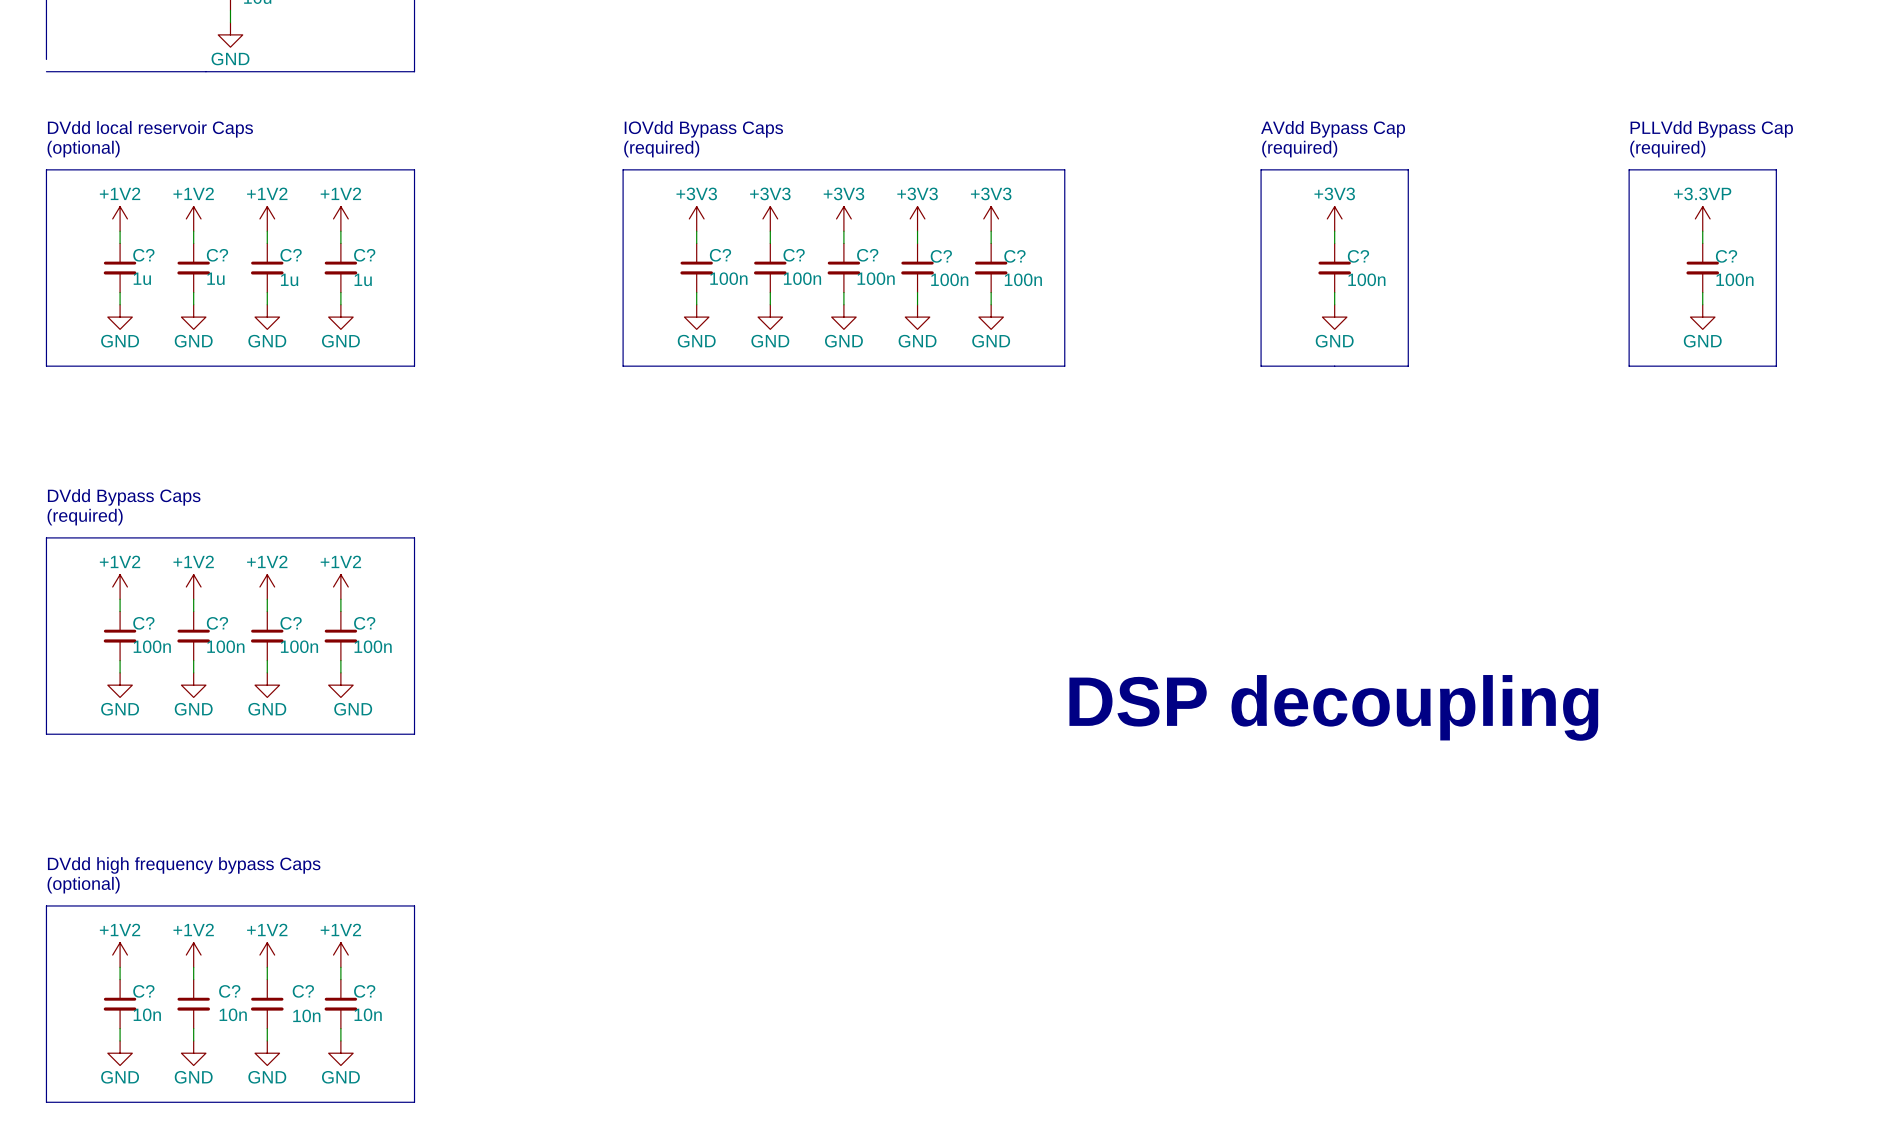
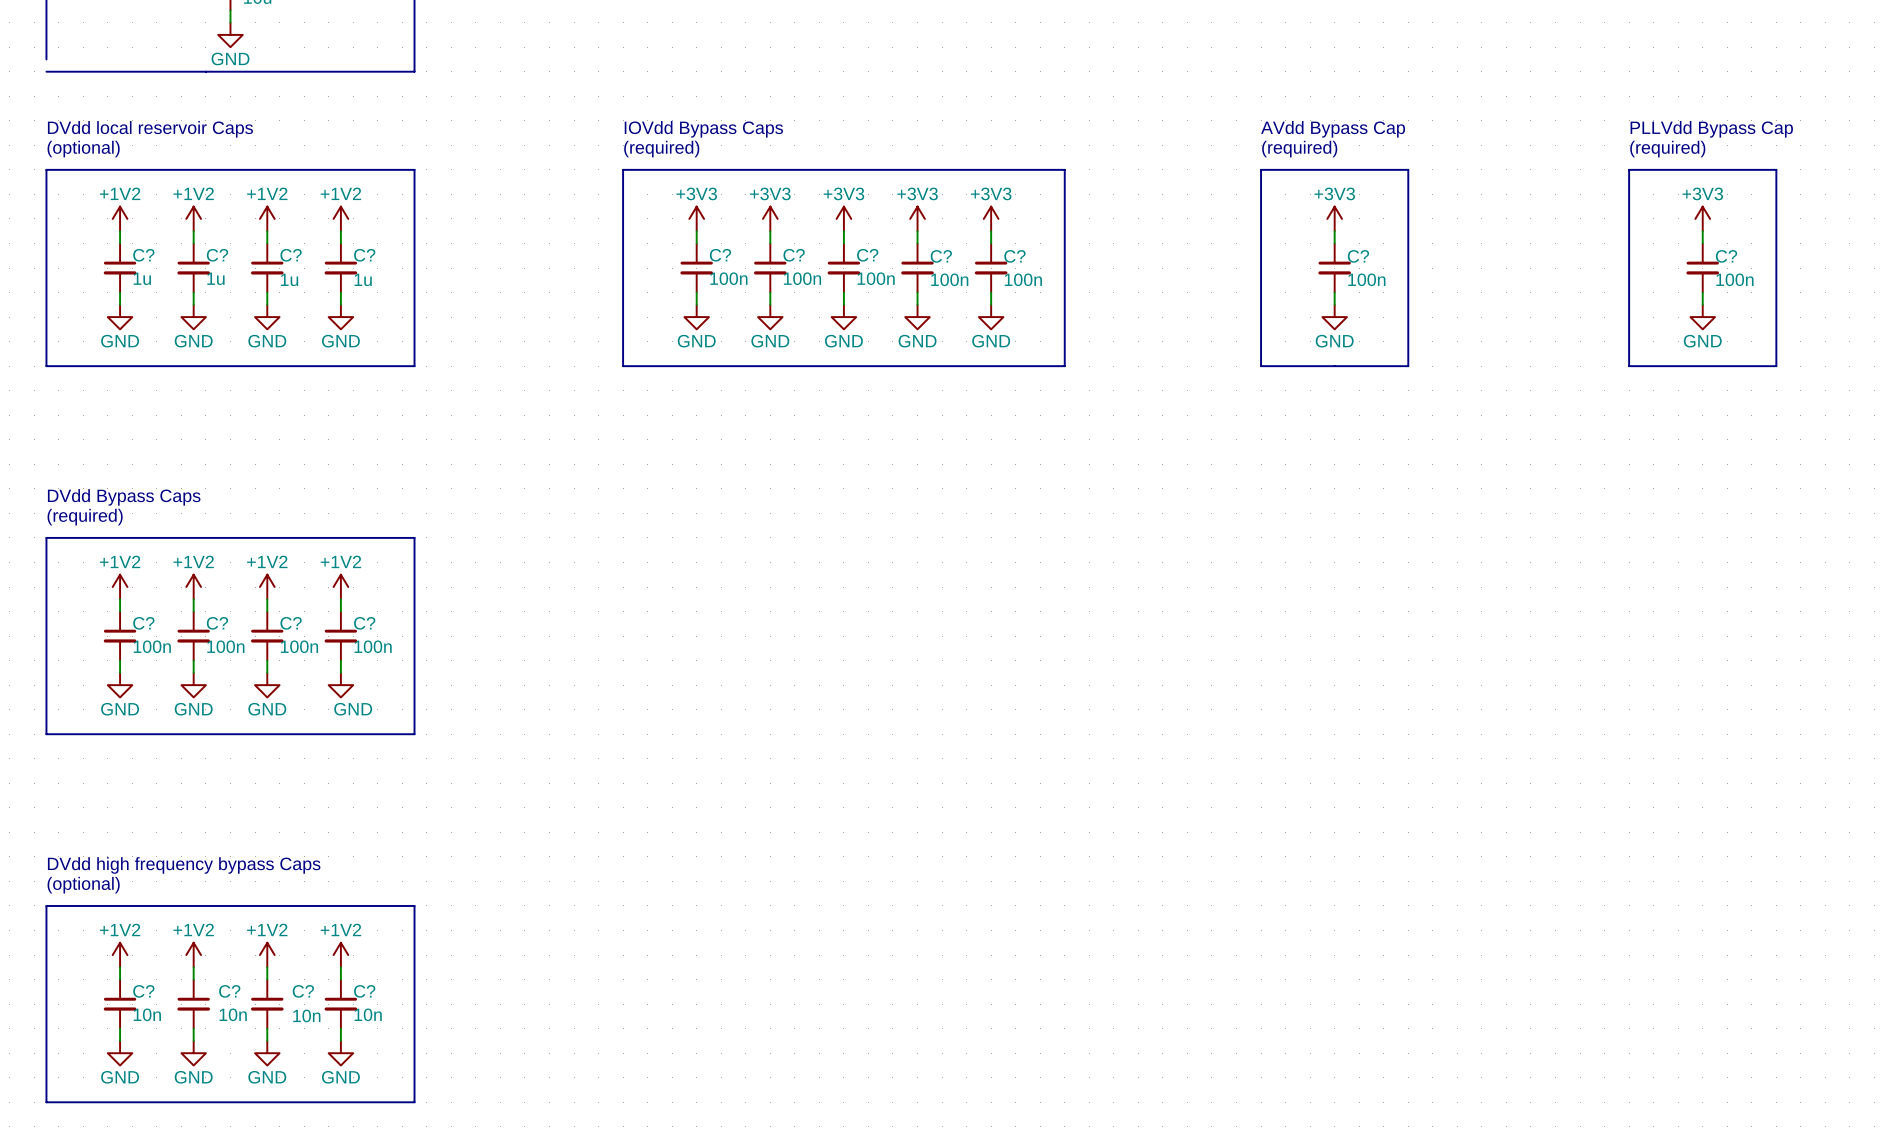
power symbol: +3.3VP (1702, 218) -> +3V3 (1702, 218)
text: DSP decoupling (1333, 707) -> none

